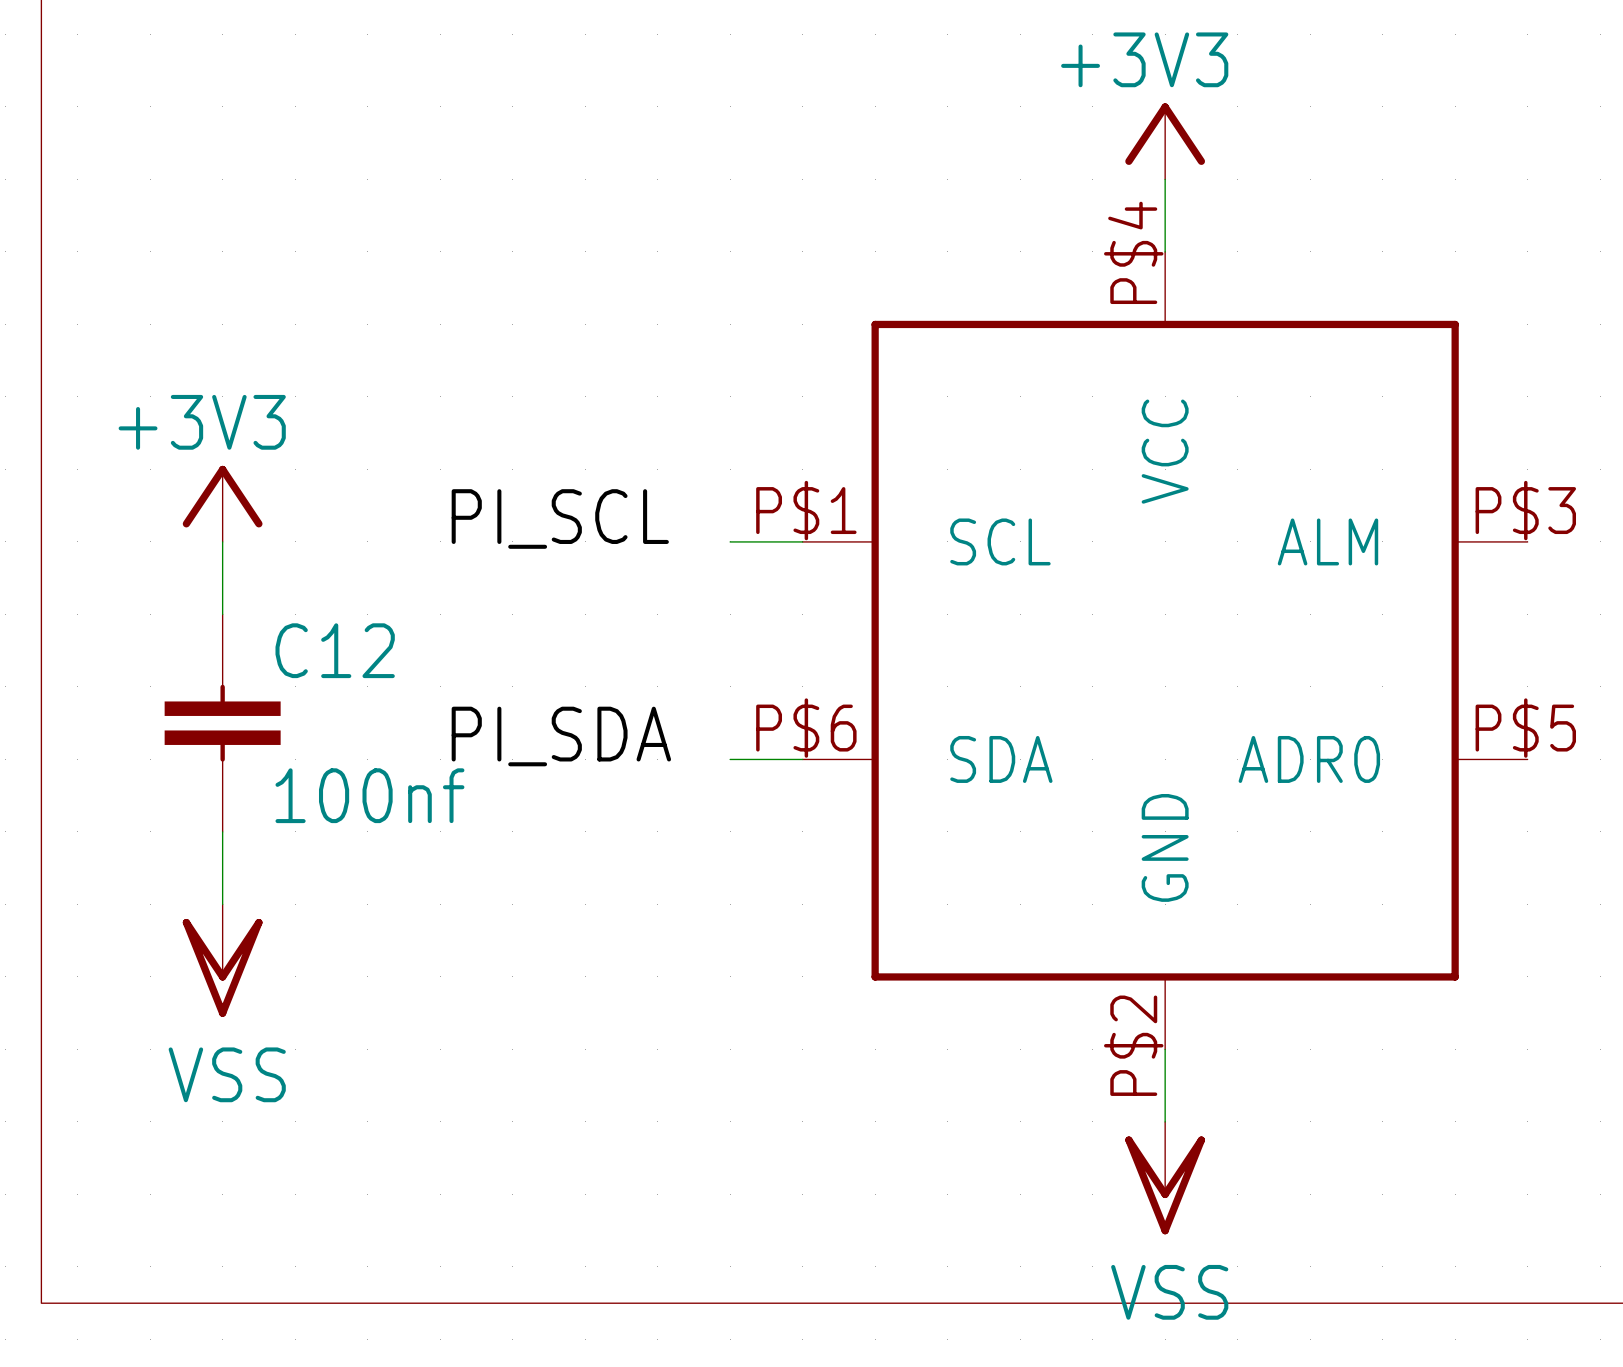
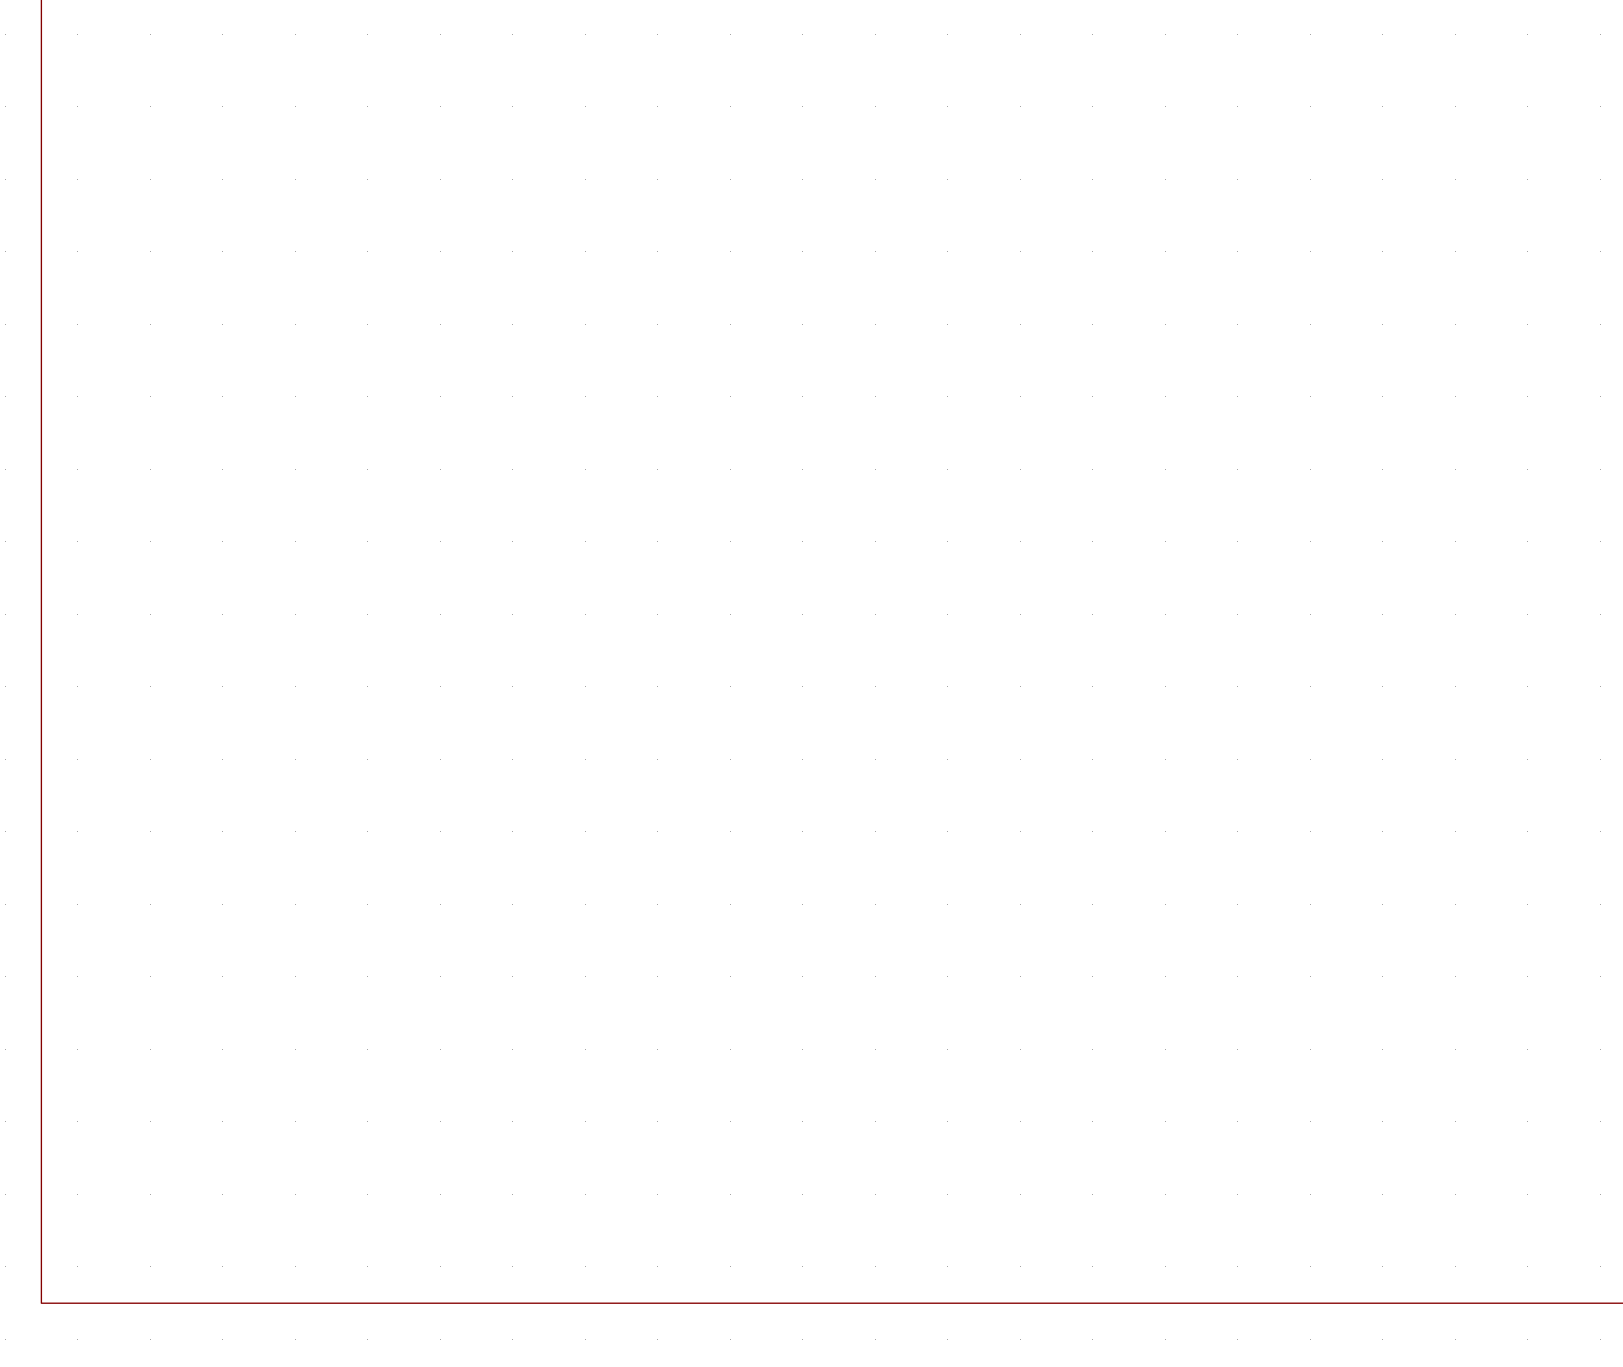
power symbol: +3V3 (1165, 141) -> none
wire: (1165, 179) (1165, 251) -> none
power symbol: +3V3 (222, 503) -> none
label: PI_SCL (560, 518) -> none
wire: (222, 541) (222, 614) -> none
wire: (730, 541) (802, 541) -> none
part: (1165, 650) -> none
C12: 100nf (222, 723) -> none
label: PI_SDA (561, 736) -> none
wire: (730, 759) (802, 759) -> none
wire: (222, 831) (222, 904) -> none
power symbol: VSS (222, 960) -> none
wire: (1165, 1049) (1165, 1121) -> none
power symbol: VSS (1165, 1178) -> none

